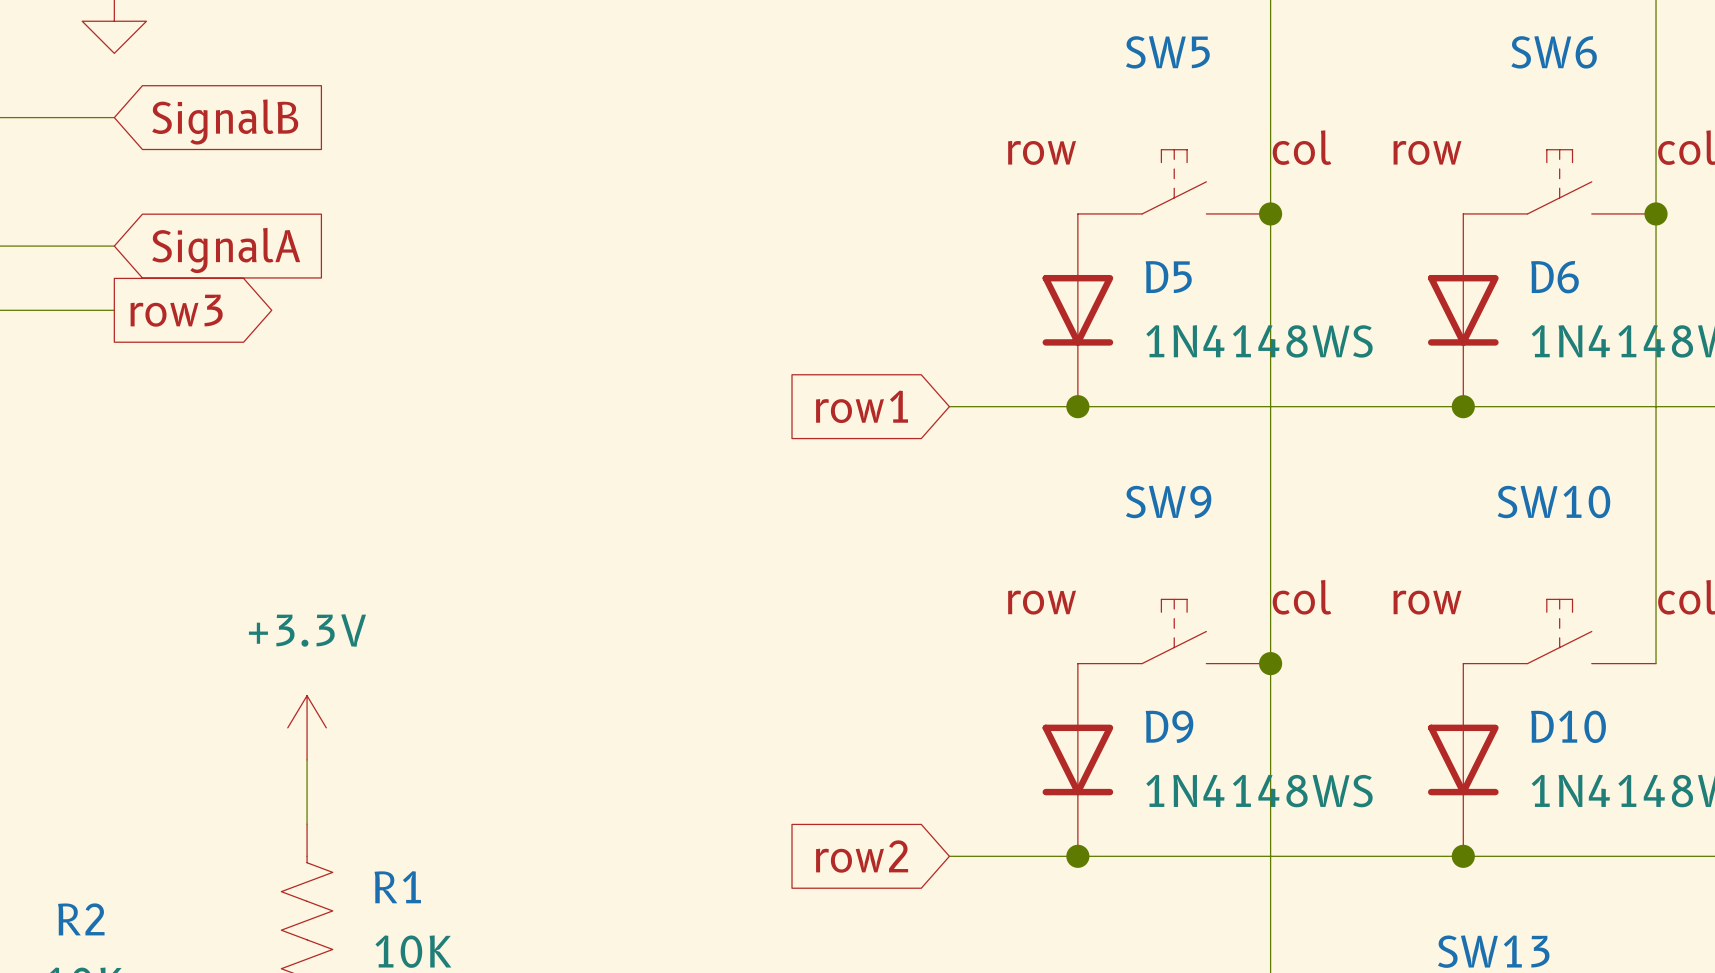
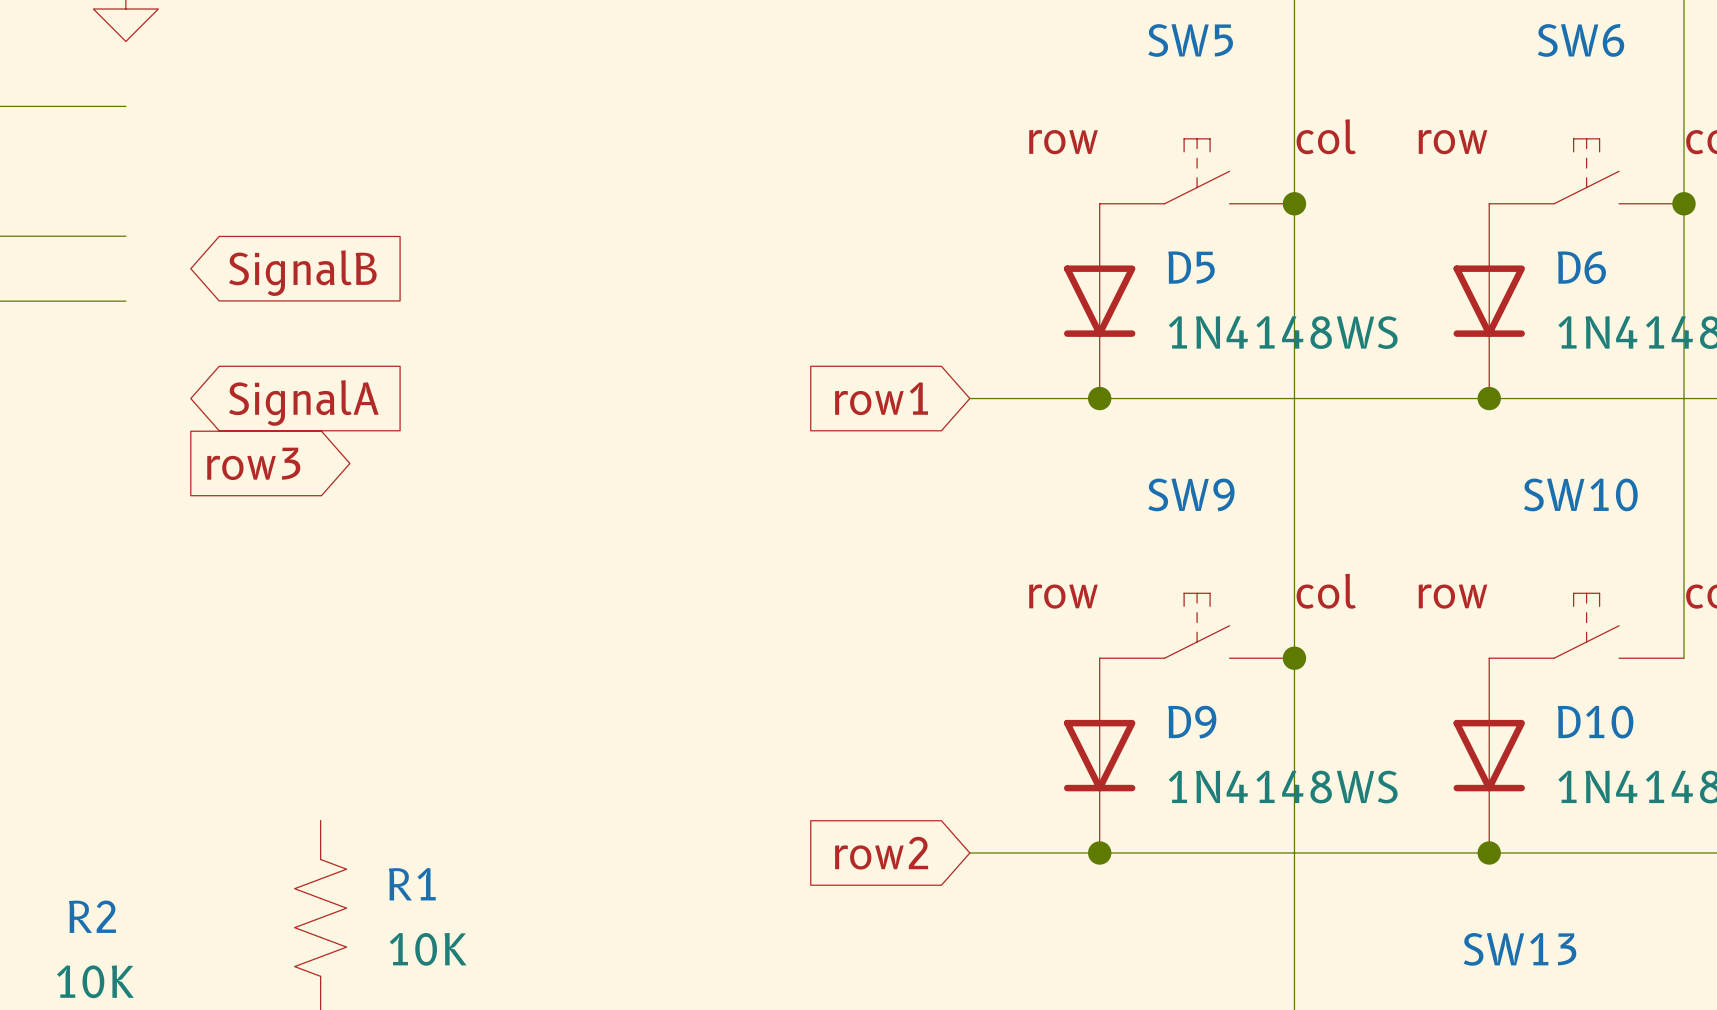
global label position: SignalB (225, 122) -> SignalB (302, 273)
global label position: SignalA (226, 250) -> SignalA (303, 402)
global label position: row3 (176, 310) -> row3 (253, 463)
power symbol: +3.3V (307, 727) -> none
wire: (307, 759) (307, 824) -> none

